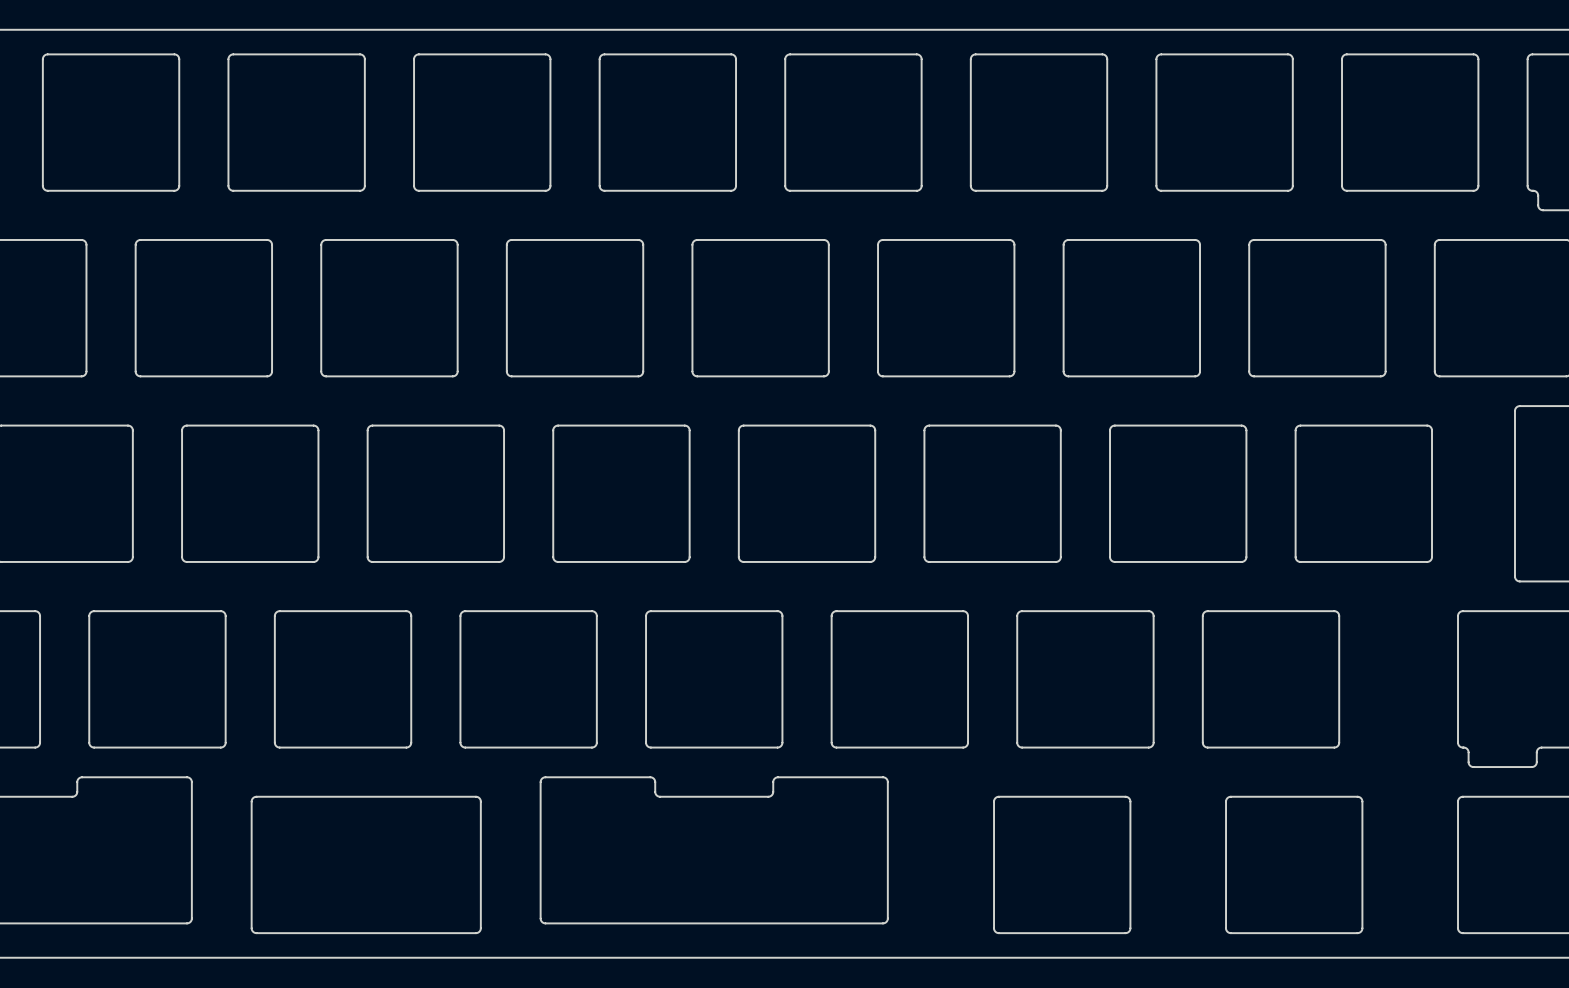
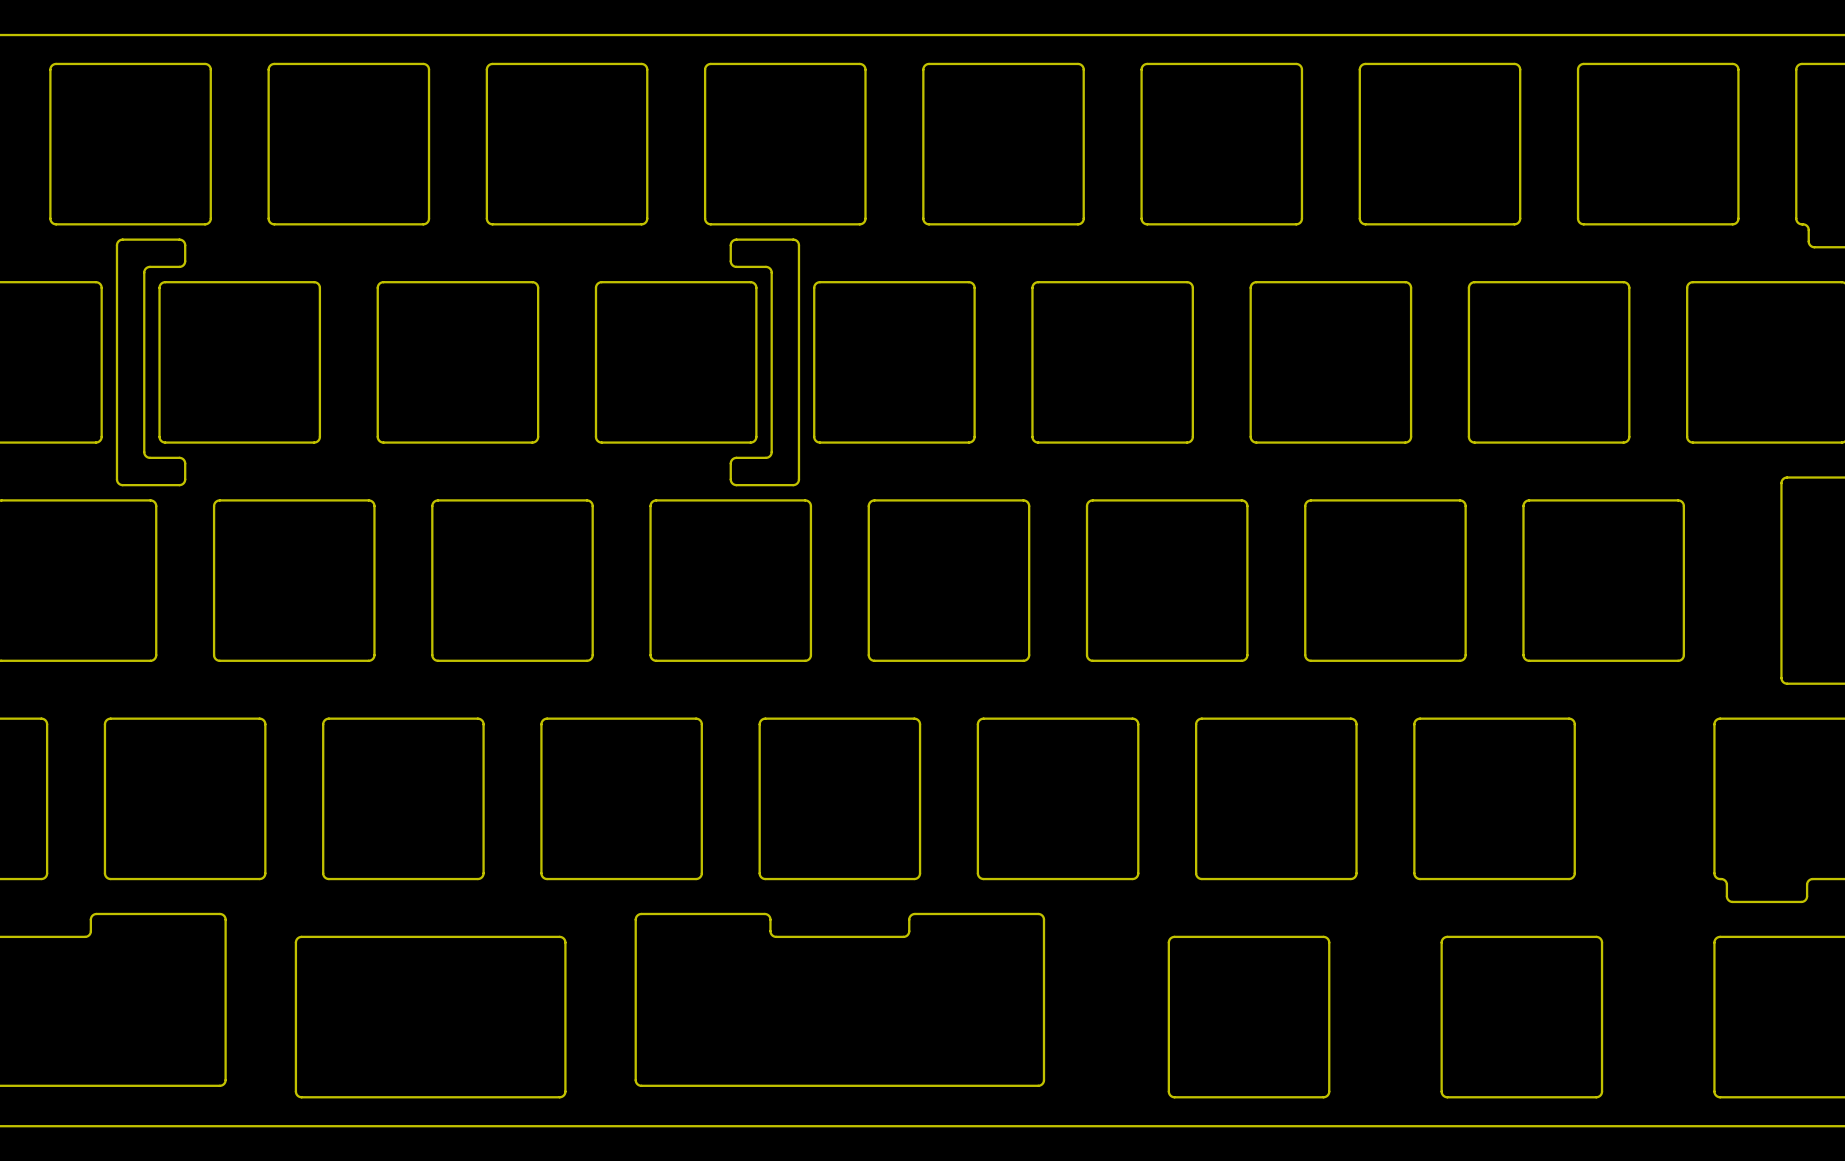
board edge: none -> (122, 239) (180, 239) (184, 243) (185, 261) (182, 265) (149, 266) (144, 272) (144, 452) (149, 457) (182, 459) (185, 462) (185, 480) (180, 484) (122, 485) (117, 480) (116, 245) (118, 241) (122, 239)
board edge: none -> (736, 239) (793, 239) (798, 243) (798, 479) (794, 484) (736, 485) (730, 480) (730, 462) (733, 459) (766, 457) (771, 452) (771, 271) (766, 266) (732, 265) (730, 244) (736, 239)

